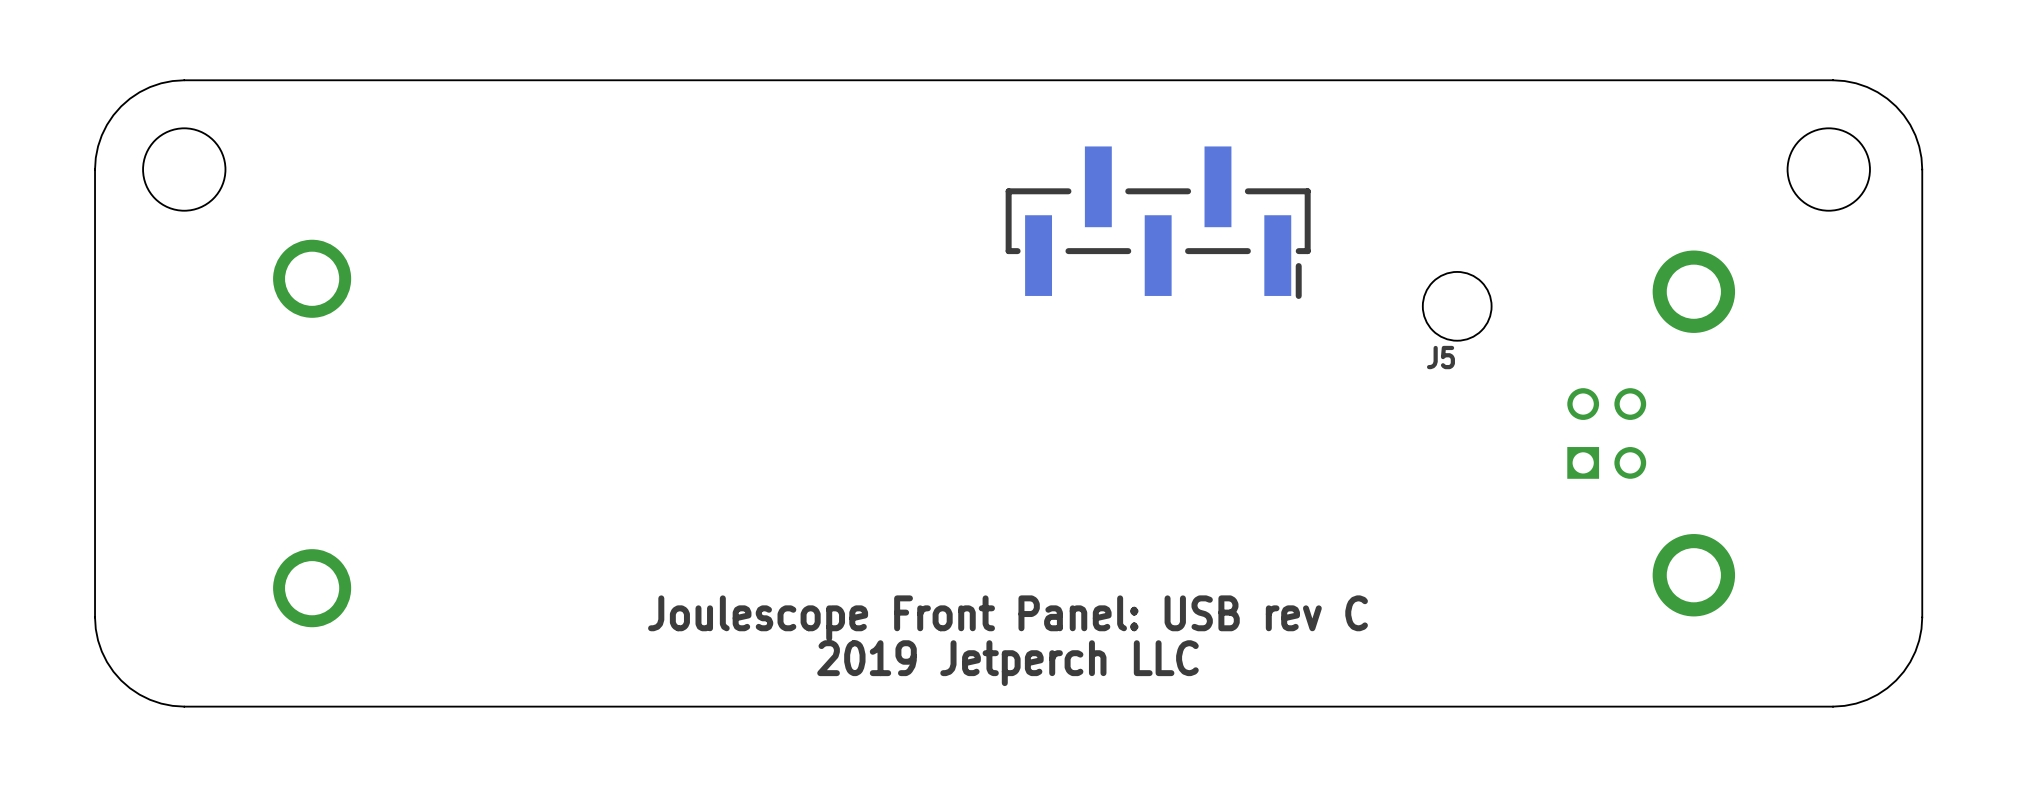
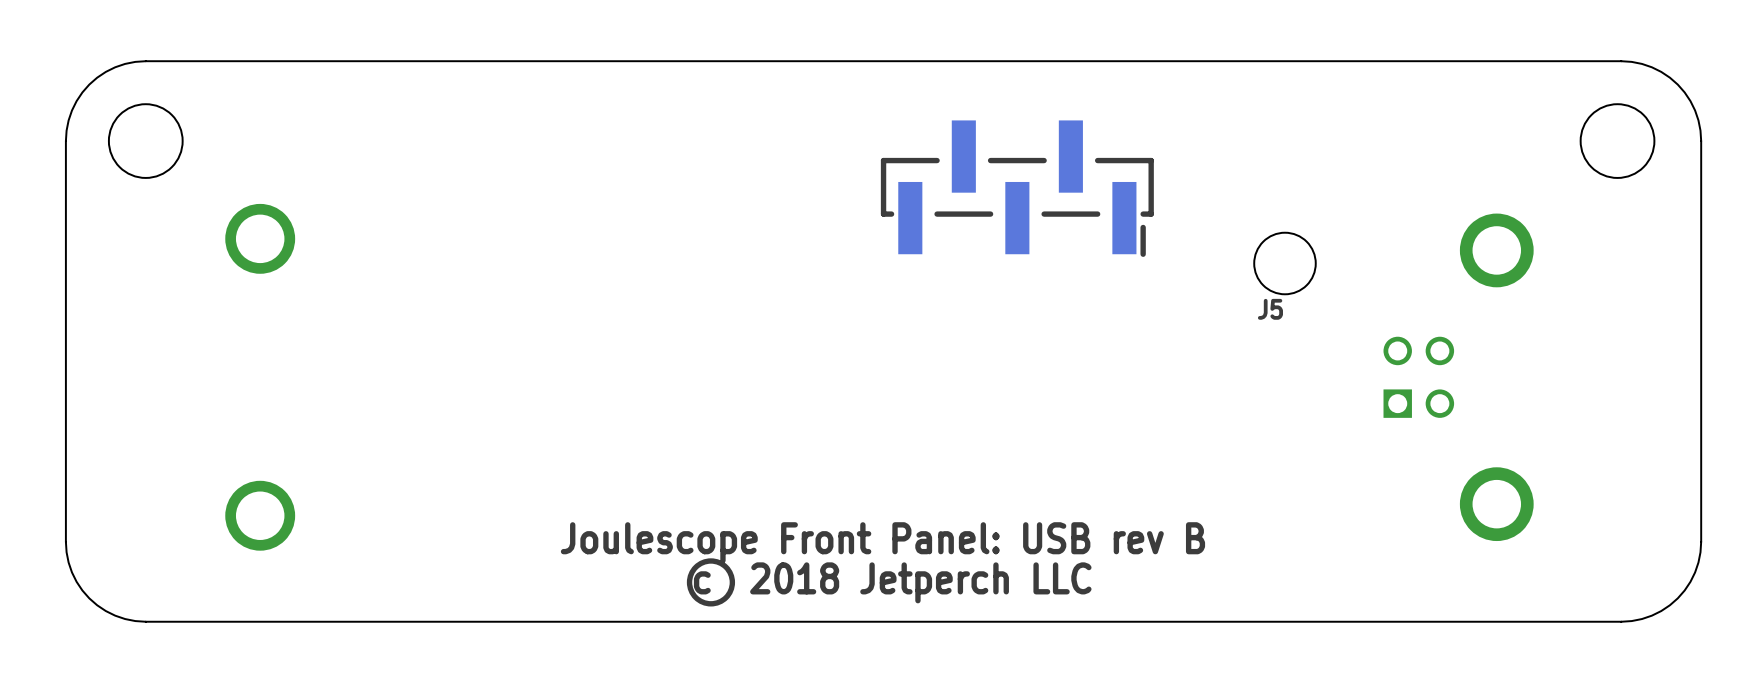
text: Joulescope Front Panel: USB rev C (1008, 618) -> Joulescope Front Panel: USB rev B (882, 542)
drawing: none -> [686, 558, 736, 607]
text: 2019 Jetperch LLC (1008, 663) -> c 2018 Jetperch LLC (892, 582)

